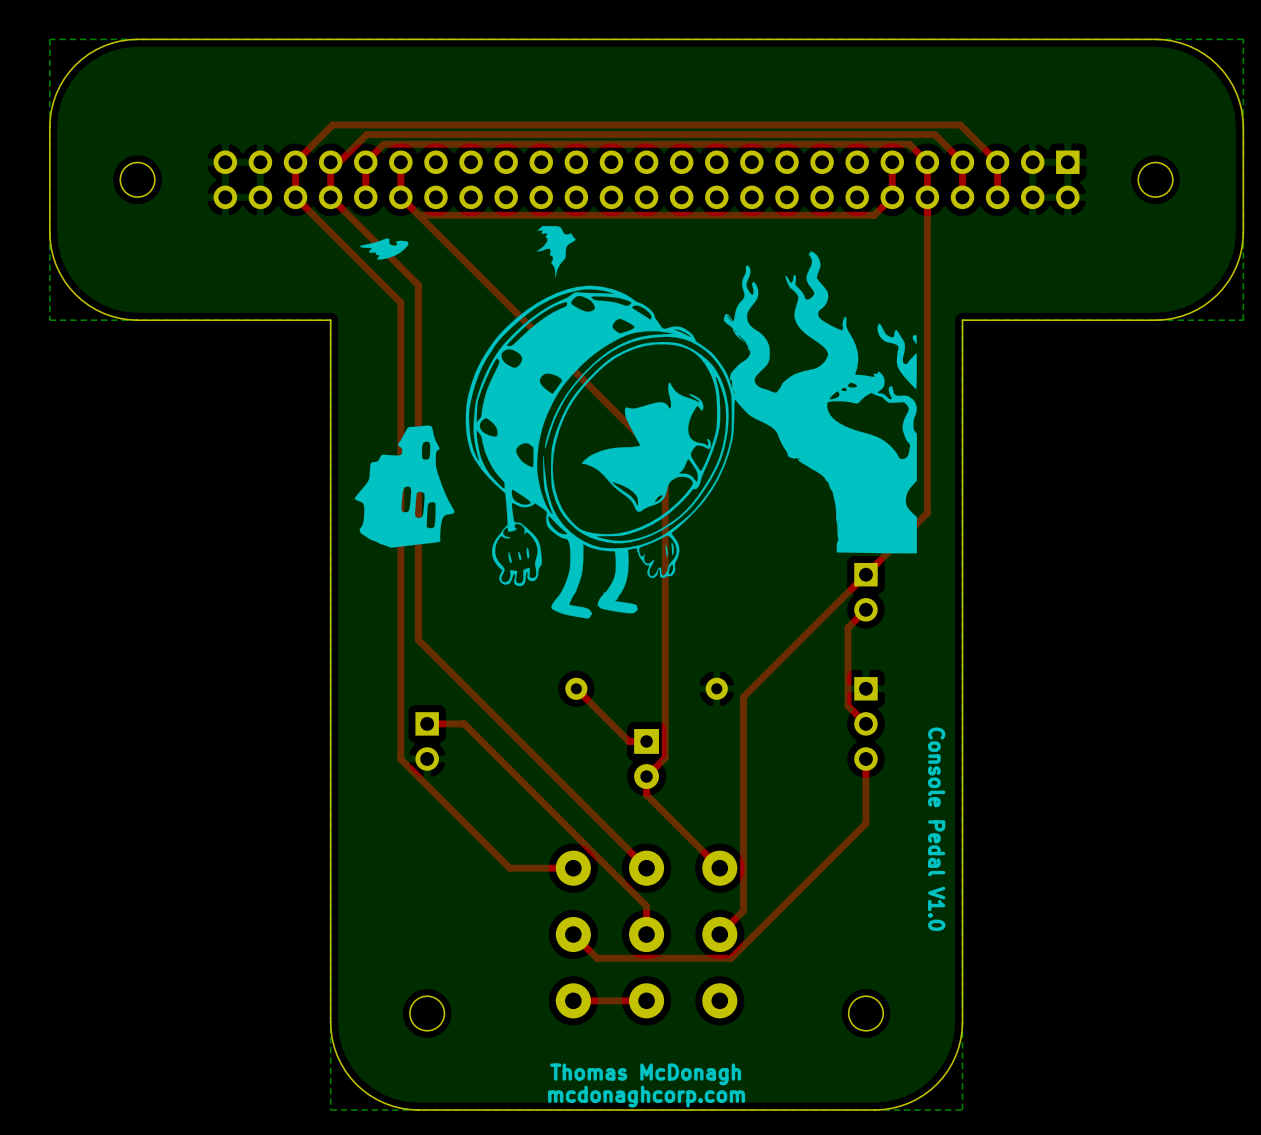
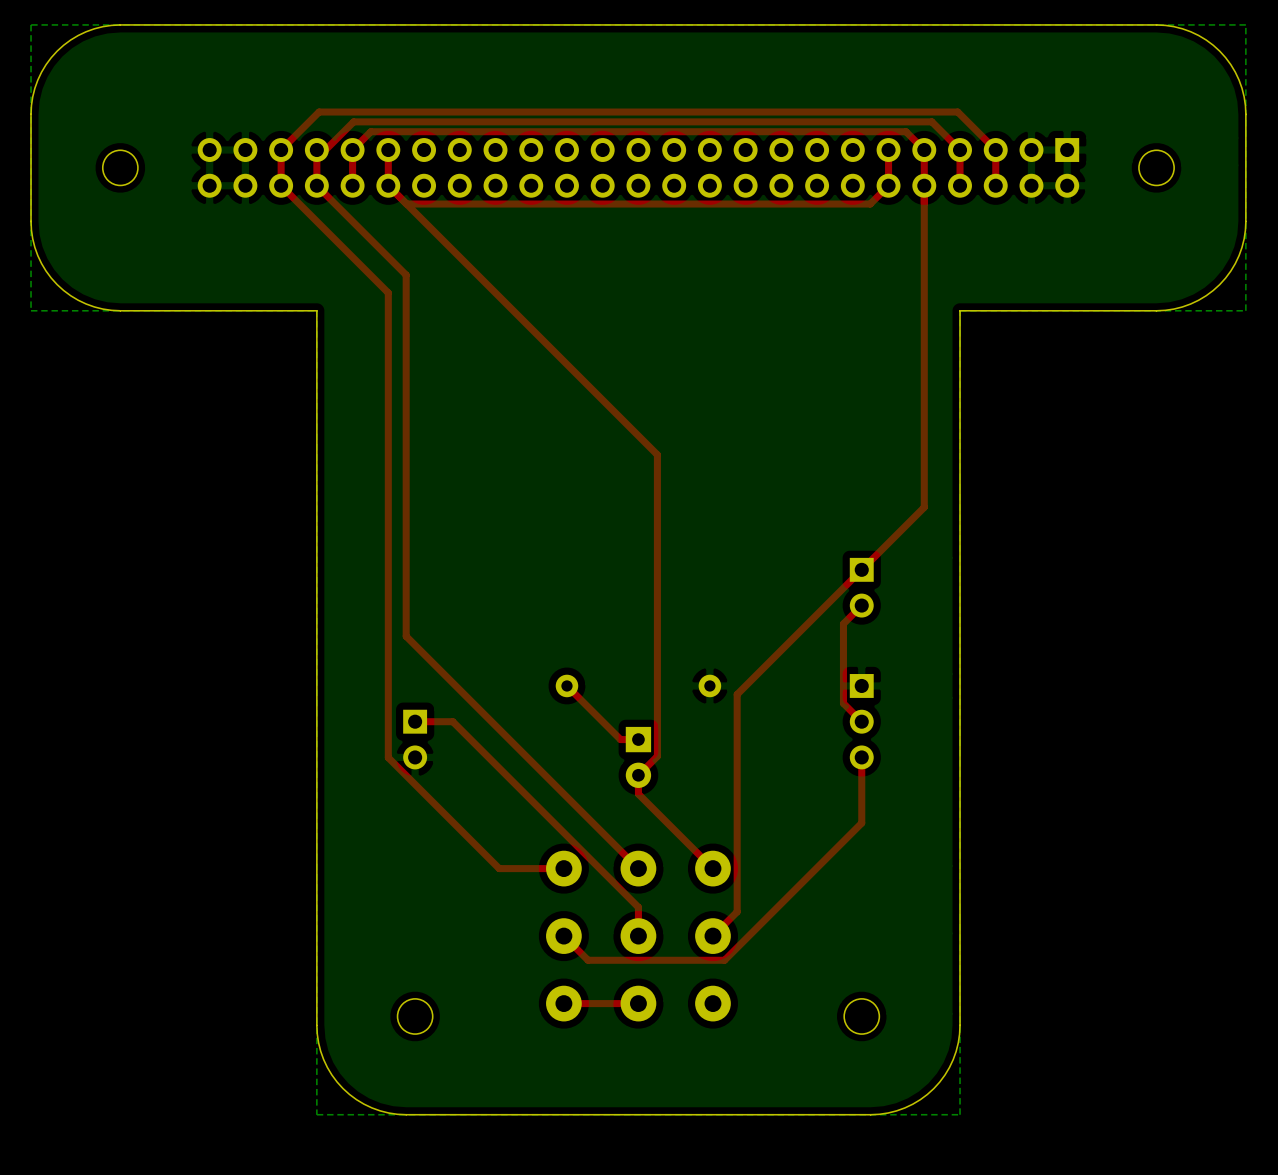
drawing: [354, 226, 917, 619] -> none
text: Console Pedal V1.0 (936, 829) -> none
text: Thomas McDonagh (645, 1074) -> none
text: mcdonaghcorp.com (646, 1096) -> none

